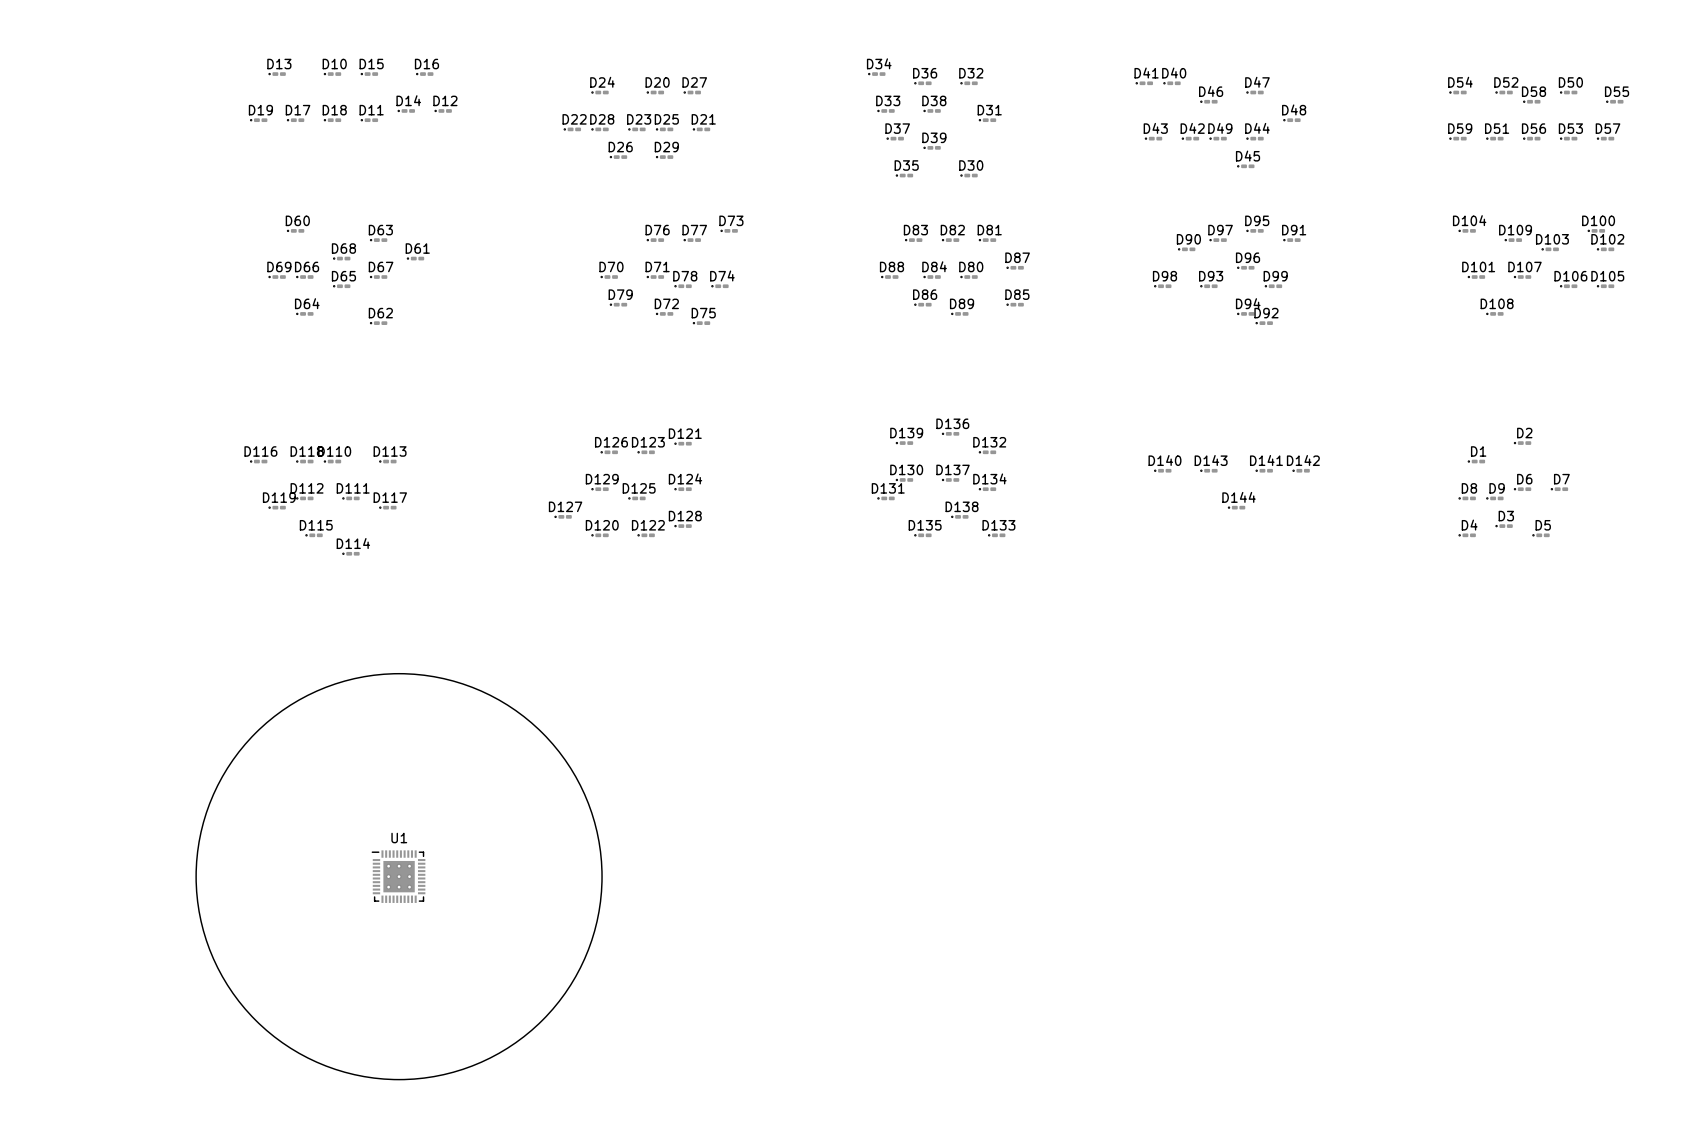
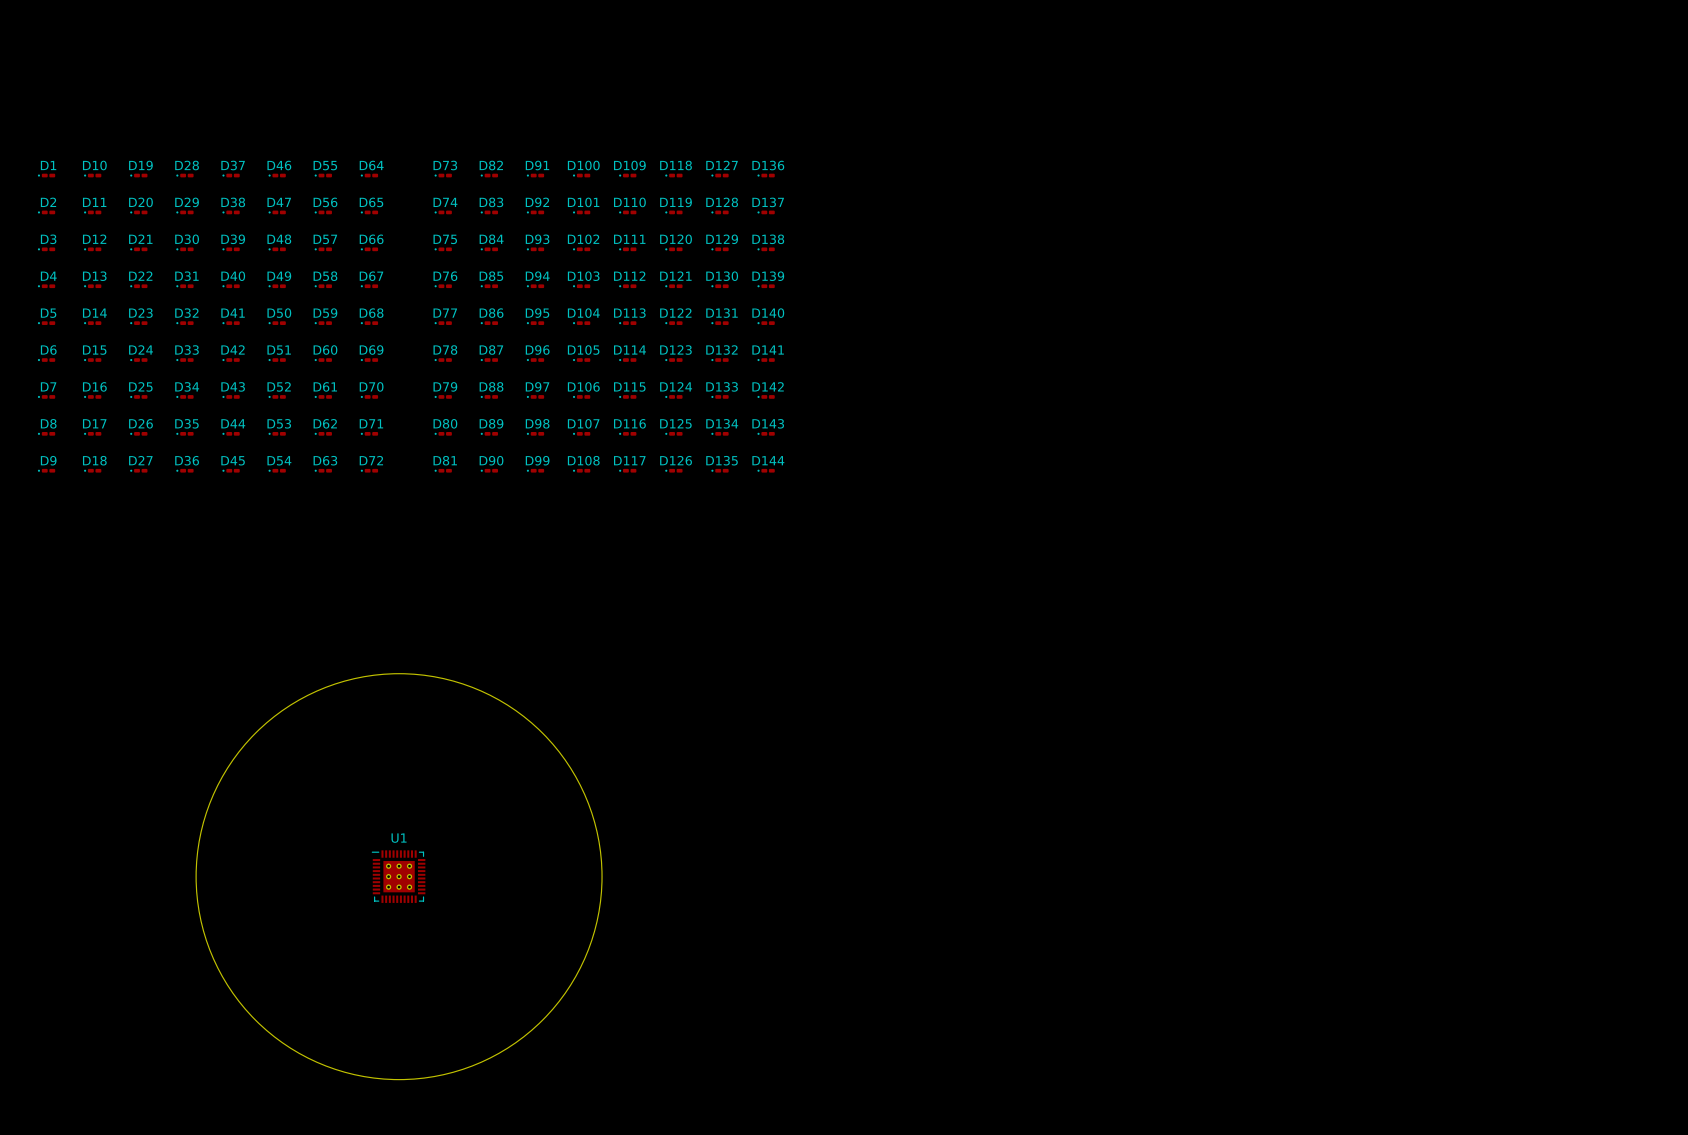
D13 position: (277, 74) -> (92, 286)
D10 position: (332, 74) -> (92, 175)
D15 position: (369, 74) -> (92, 360)
D16 position: (424, 74) -> (92, 396)
D34 position: (876, 74) -> (185, 396)
D36 position: (923, 83) -> (185, 470)
D32 position: (969, 83) -> (185, 323)
D41 position: (1144, 83) -> (231, 323)
D40 position: (1172, 83) -> (231, 286)
D24 position: (600, 92) -> (138, 360)
D20 position: (655, 92) -> (138, 212)
D27 position: (692, 92) -> (138, 470)
D47 position: (1255, 92) -> (277, 212)
D54 position: (1458, 92) -> (277, 470)
D52 position: (1504, 92) -> (277, 396)
D50 position: (1568, 92) -> (277, 323)
D46 position: (1209, 101) -> (277, 175)
D58 position: (1531, 101) -> (323, 286)
D55 position: (1614, 101) -> (323, 175)
D14 position: (406, 110) -> (92, 323)
D12 position: (443, 110) -> (92, 249)
D33 position: (886, 110) -> (185, 360)
D38 position: (932, 110) -> (231, 212)
D19 position: (258, 120) -> (138, 175)
D17 position: (295, 120) -> (92, 433)
D18 position: (332, 120) -> (92, 470)
D11 position: (369, 120) -> (92, 212)
D31 position: (987, 120) -> (185, 286)
D48 position: (1292, 120) -> (277, 249)
D22 position: (572, 129) -> (138, 286)
D28 position: (600, 129) -> (185, 175)
D23 position: (637, 129) -> (138, 323)
D25 position: (664, 129) -> (138, 396)
D21 position: (701, 129) -> (138, 249)
D37 position: (895, 138) -> (231, 175)
D43 position: (1153, 138) -> (231, 396)
D42 position: (1190, 138) -> (231, 360)
D49 position: (1218, 138) -> (277, 286)
D44 position: (1255, 138) -> (231, 433)
D59 position: (1458, 138) -> (323, 323)
D51 position: (1494, 138) -> (277, 360)
D56 position: (1531, 138) -> (323, 212)
D53 position: (1568, 138) -> (277, 433)
D57 position: (1605, 138) -> (323, 249)
D39 position: (932, 147) -> (231, 249)
D26 position: (618, 157) -> (138, 433)
D29 position: (664, 157) -> (185, 212)
D45 position: (1245, 166) -> (231, 470)
D35 position: (904, 175) -> (185, 433)
D30 position: (969, 175) -> (185, 249)
D74: none -> (443, 212)
D60 position: (295, 230) -> (323, 360)
D73 position: (729, 230) -> (443, 175)
D95 position: (1255, 230) -> (535, 323)
D104 position: (1467, 230) -> (581, 323)
D100 position: (1596, 230) -> (581, 175)
D63 position: (378, 240) -> (323, 470)
D76 position: (655, 240) -> (443, 286)
D77 position: (692, 240) -> (443, 323)
D83 position: (913, 240) -> (489, 212)
D82 position: (950, 240) -> (489, 175)
D81 position: (987, 240) -> (443, 470)
D97 position: (1218, 240) -> (535, 396)
D91 position: (1292, 240) -> (535, 175)
D109 position: (1513, 240) -> (627, 175)
D90 position: (1186, 249) -> (489, 470)
D103 position: (1550, 249) -> (581, 286)
D102 position: (1605, 249) -> (581, 249)
D68 position: (341, 258) -> (369, 323)
D61 position: (415, 258) -> (323, 396)
D87 position: (1015, 267) -> (489, 360)
D96 position: (1245, 267) -> (535, 360)
D74 name: D74 (722, 275) -> D130 (722, 276)
D69 position: (277, 277) -> (369, 360)
D66 position: (304, 277) -> (369, 249)
D67 position: (378, 277) -> (369, 286)
D70 position: (609, 277) -> (369, 396)
D71 position: (655, 277) -> (369, 433)
D88 position: (889, 277) -> (489, 396)
D84 position: (932, 277) -> (489, 249)
D80 position: (969, 277) -> (443, 433)
D101 position: (1476, 277) -> (581, 212)
D107 position: (1522, 277) -> (581, 433)
D65 position: (341, 286) -> (369, 212)
D78 position: (683, 286) -> (443, 360)
D98 position: (1162, 286) -> (535, 433)
D93 position: (1209, 286) -> (535, 249)
D99 position: (1273, 286) -> (535, 470)
D106 position: (1568, 286) -> (581, 396)
D105 position: (1605, 286) -> (581, 360)
D79 position: (618, 304) -> (443, 396)
D86 position: (923, 304) -> (489, 323)
D85 position: (1015, 304) -> (489, 286)
D64 position: (304, 313) -> (369, 175)
D72 position: (664, 313) -> (369, 470)
D89 position: (959, 313) -> (489, 433)
D94 position: (1245, 313) -> (535, 286)
D108 position: (1494, 313) -> (581, 470)
D62 position: (378, 323) -> (323, 433)
D75 position: (701, 323) -> (443, 249)
D92 position: (1264, 323) -> (535, 212)
D136 position: (950, 433) -> (766, 175)
D121 position: (683, 443) -> (673, 286)
D139 position: (904, 443) -> (766, 286)
D2 position: (1522, 443) -> (46, 212)
D126 position: (609, 452) -> (673, 470)
D123 position: (646, 452) -> (673, 360)
D132 position: (987, 452) -> (720, 360)
D116 position: (258, 461) -> (627, 433)
D118 position: (304, 461) -> (673, 175)
D110 position: (332, 461) -> (627, 212)
D113 position: (387, 461) -> (627, 323)
D1 position: (1476, 461) -> (46, 175)
D140 position: (1162, 470) -> (766, 323)
D143 position: (1209, 470) -> (766, 433)
D141 position: (1264, 470) -> (766, 360)
D142 position: (1301, 470) -> (766, 396)
D130: (904, 479) -> none
D137 position: (950, 479) -> (766, 212)
D129 position: (600, 489) -> (720, 249)
D124 position: (683, 489) -> (673, 396)
D134 position: (987, 489) -> (720, 433)
D6 position: (1522, 489) -> (46, 360)
D7 position: (1559, 489) -> (46, 396)
D112 position: (304, 498) -> (627, 286)
D111 position: (351, 498) -> (627, 249)
D125 position: (637, 498) -> (673, 433)
D131 position: (886, 498) -> (720, 323)
D8 position: (1467, 498) -> (46, 433)
D9 position: (1494, 498) -> (46, 470)
D119 position: (277, 507) -> (673, 212)
D117 position: (387, 507) -> (627, 470)
D144 position: (1236, 507) -> (766, 470)
D127 position: (563, 516) -> (720, 175)
D138 position: (959, 516) -> (766, 249)
D128 position: (683, 526) -> (720, 212)
D3 position: (1504, 526) -> (46, 249)
D115 position: (314, 535) -> (627, 396)
D120 position: (600, 535) -> (673, 249)
D122 position: (646, 535) -> (673, 323)
D135 position: (923, 535) -> (720, 470)
D133 position: (996, 535) -> (720, 396)
D4 position: (1467, 535) -> (46, 286)
D5 position: (1541, 535) -> (46, 323)
D114 position: (351, 553) -> (627, 360)

